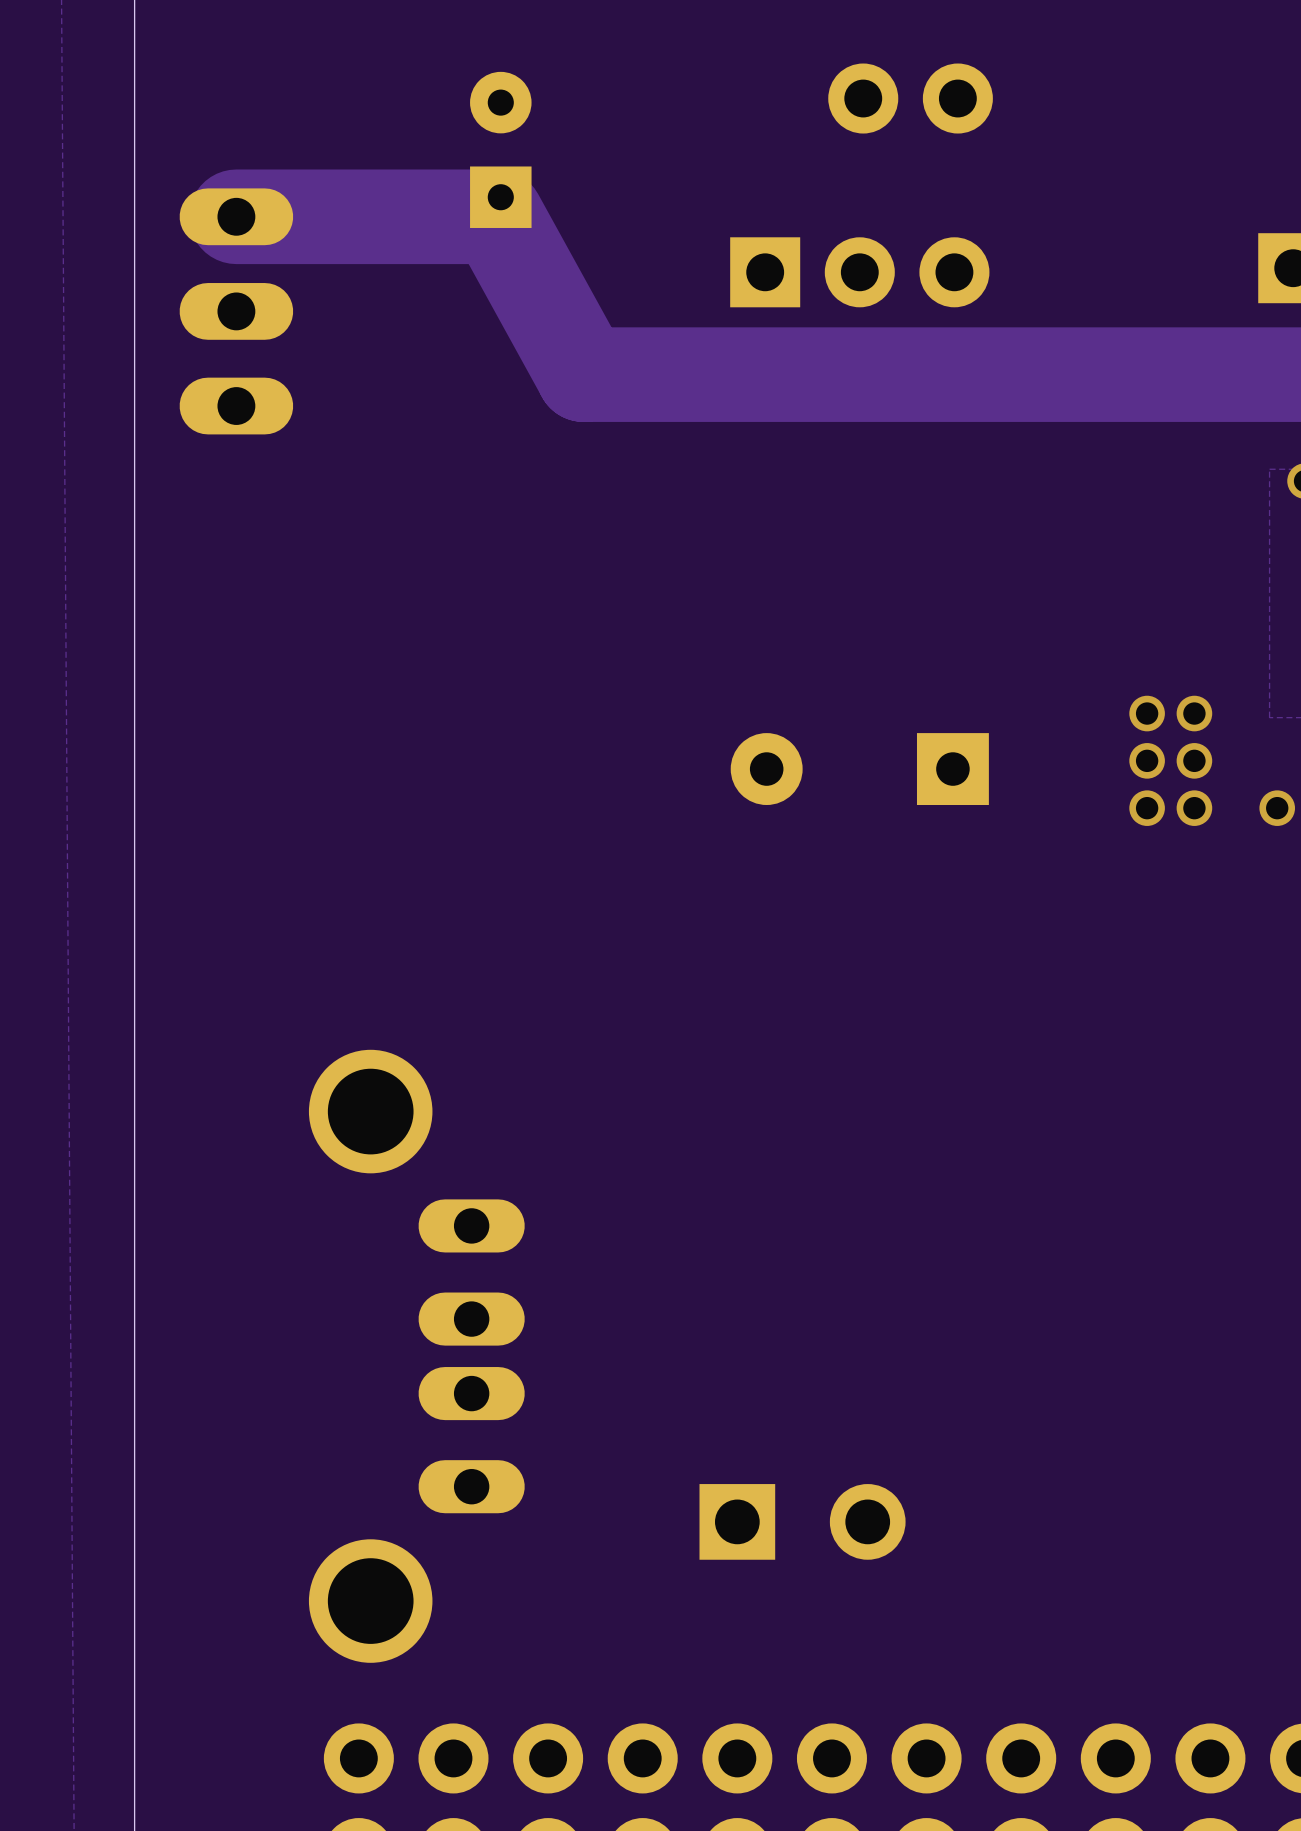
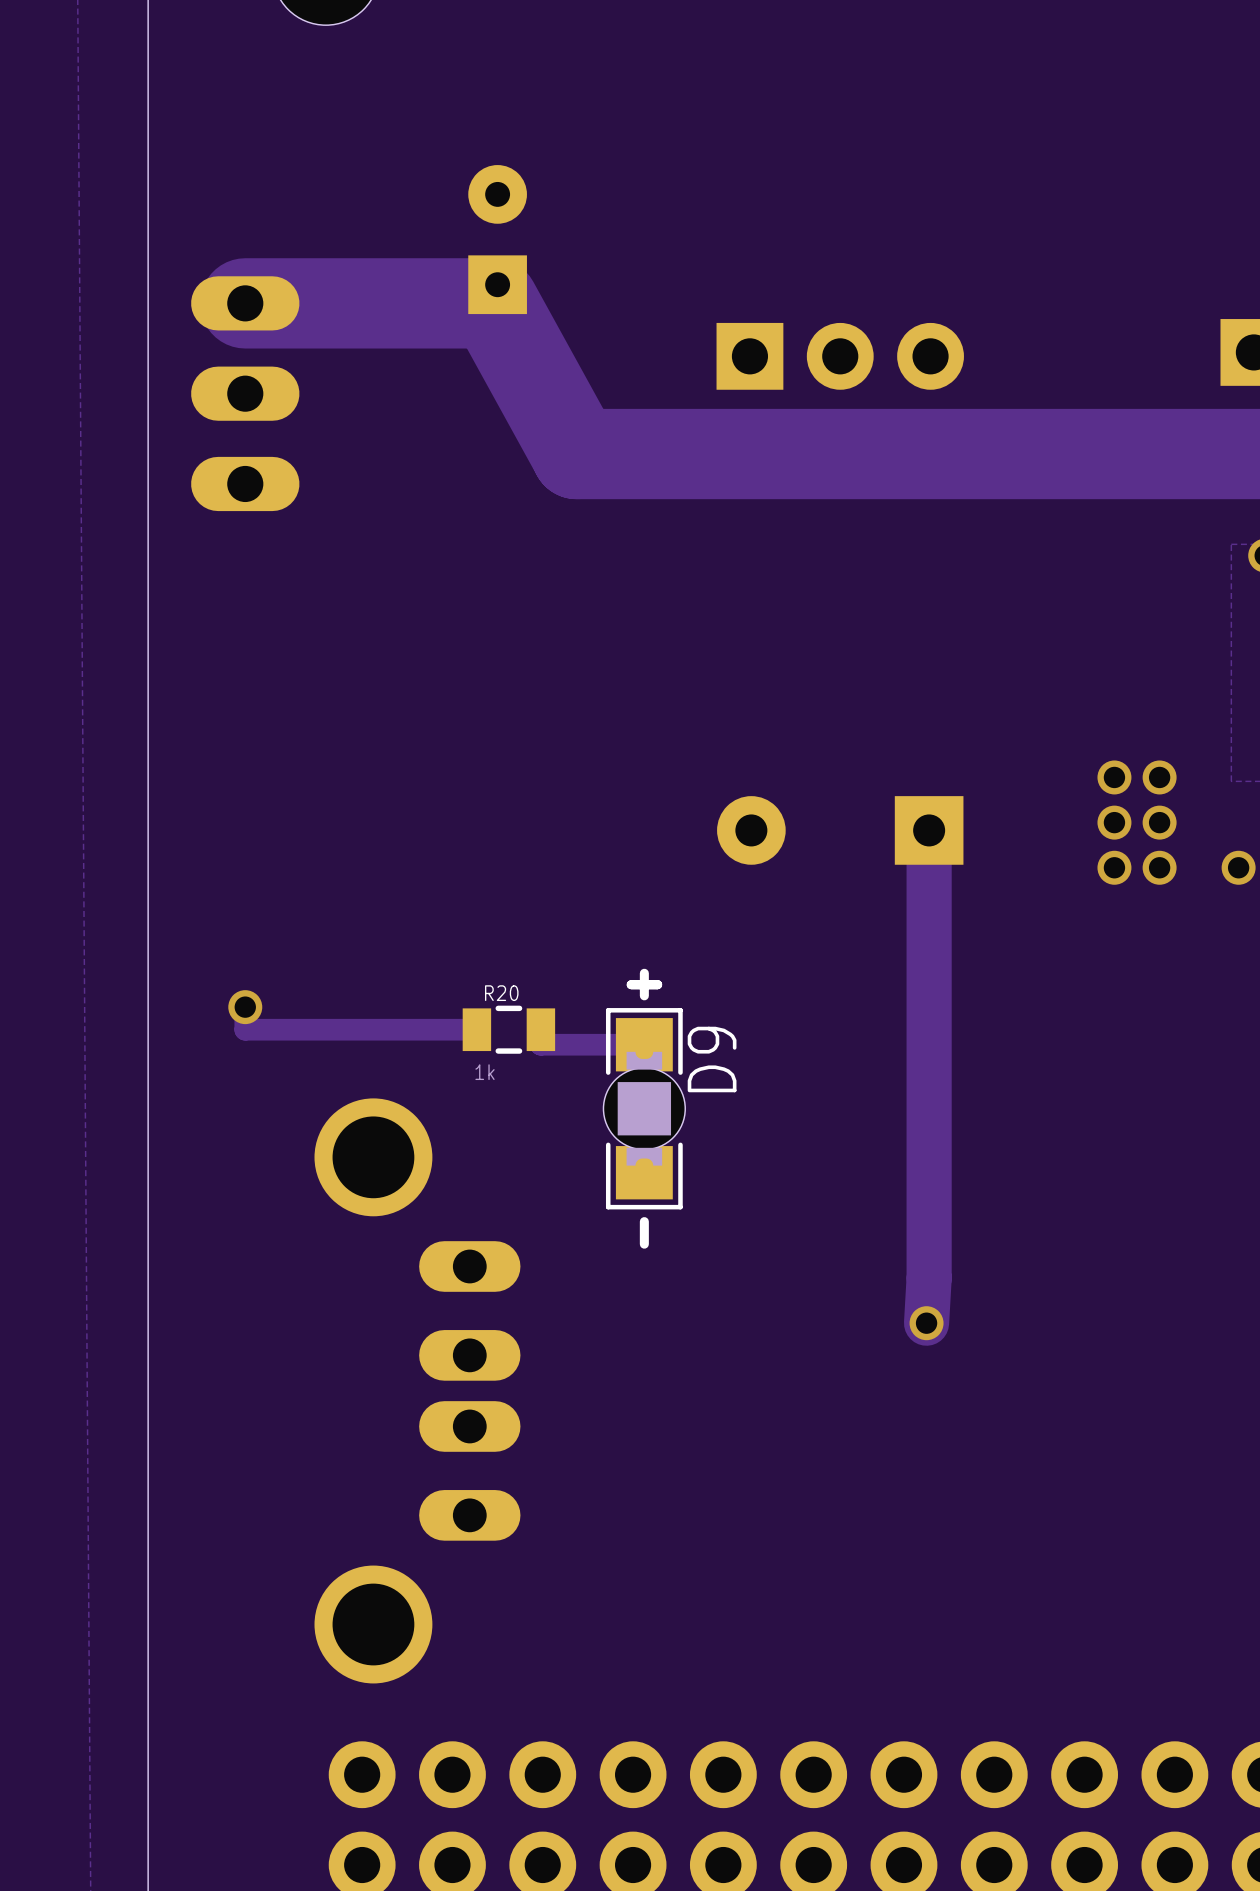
part: (910, 98) -> none
track: none -> (929, 830) (929, 1278) (926, 1323)
track: none -> (245, 1007) (245, 1029) (476, 1029)
via: none -> (245, 1007)
R20: none -> 1k (508, 1029)
track: none -> (540, 1029) (540, 1044) (644, 1044)
D9: none -> (644, 1108)
via: none -> (926, 1323)
part: (802, 1521) -> none

